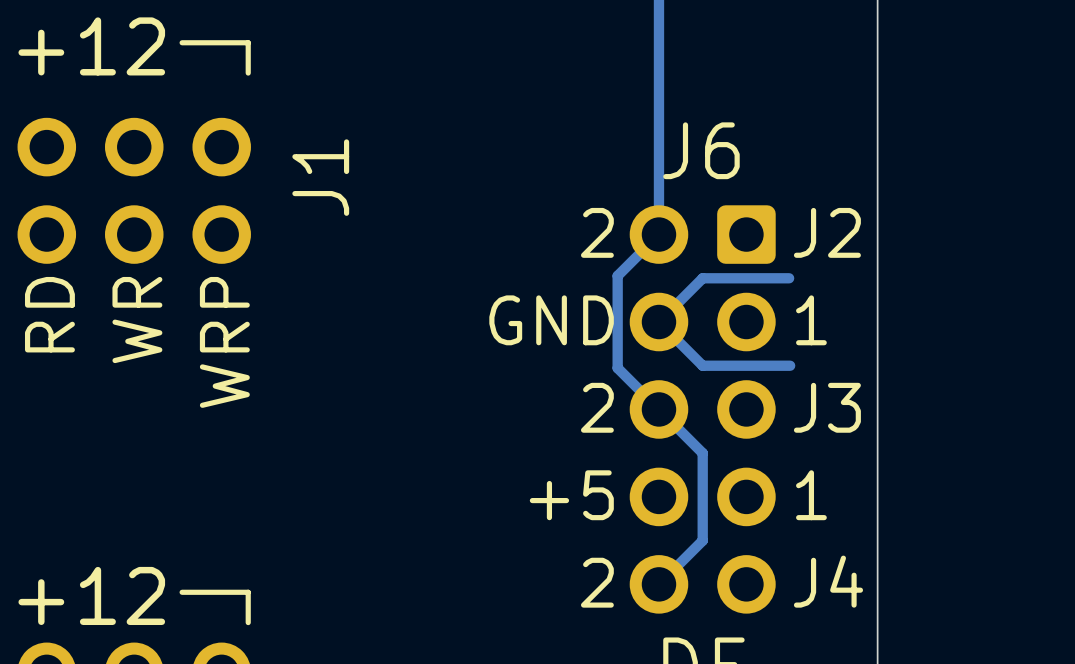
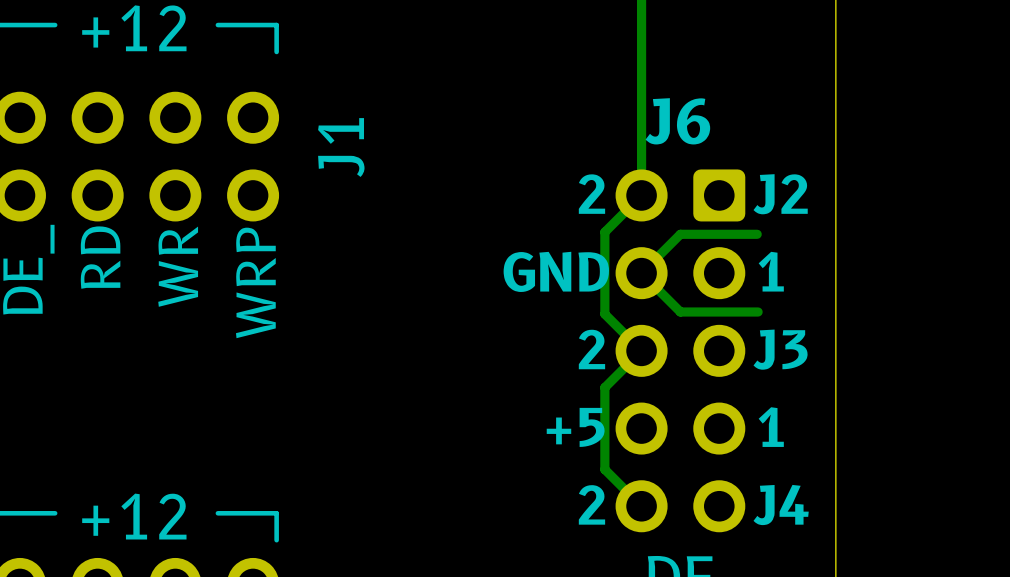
track: (658, 409) (702, 453) (702, 540) (658, 584) -> (641, 350) (604, 387) (604, 469) (641, 506)

